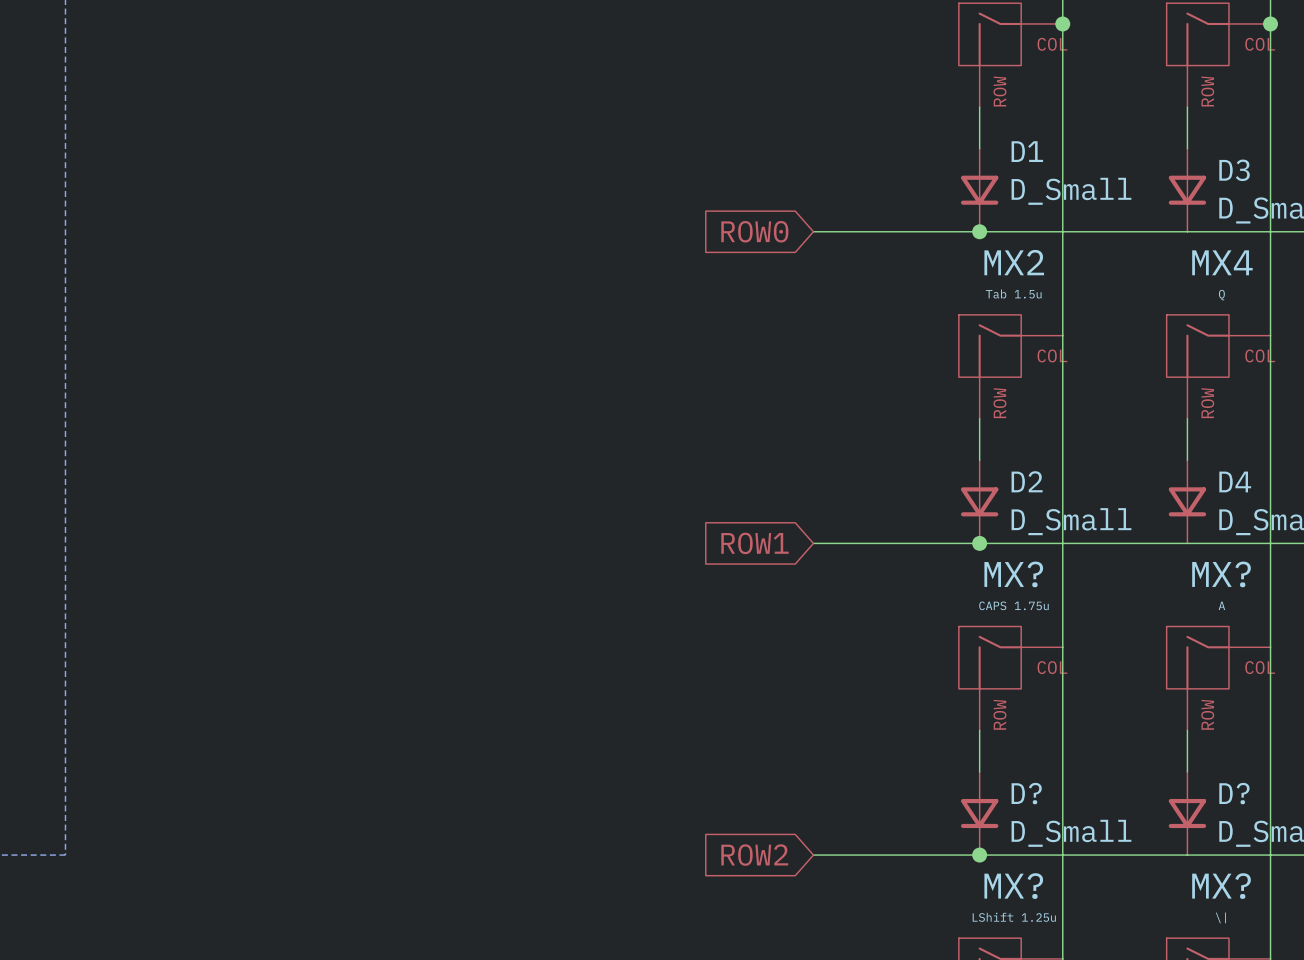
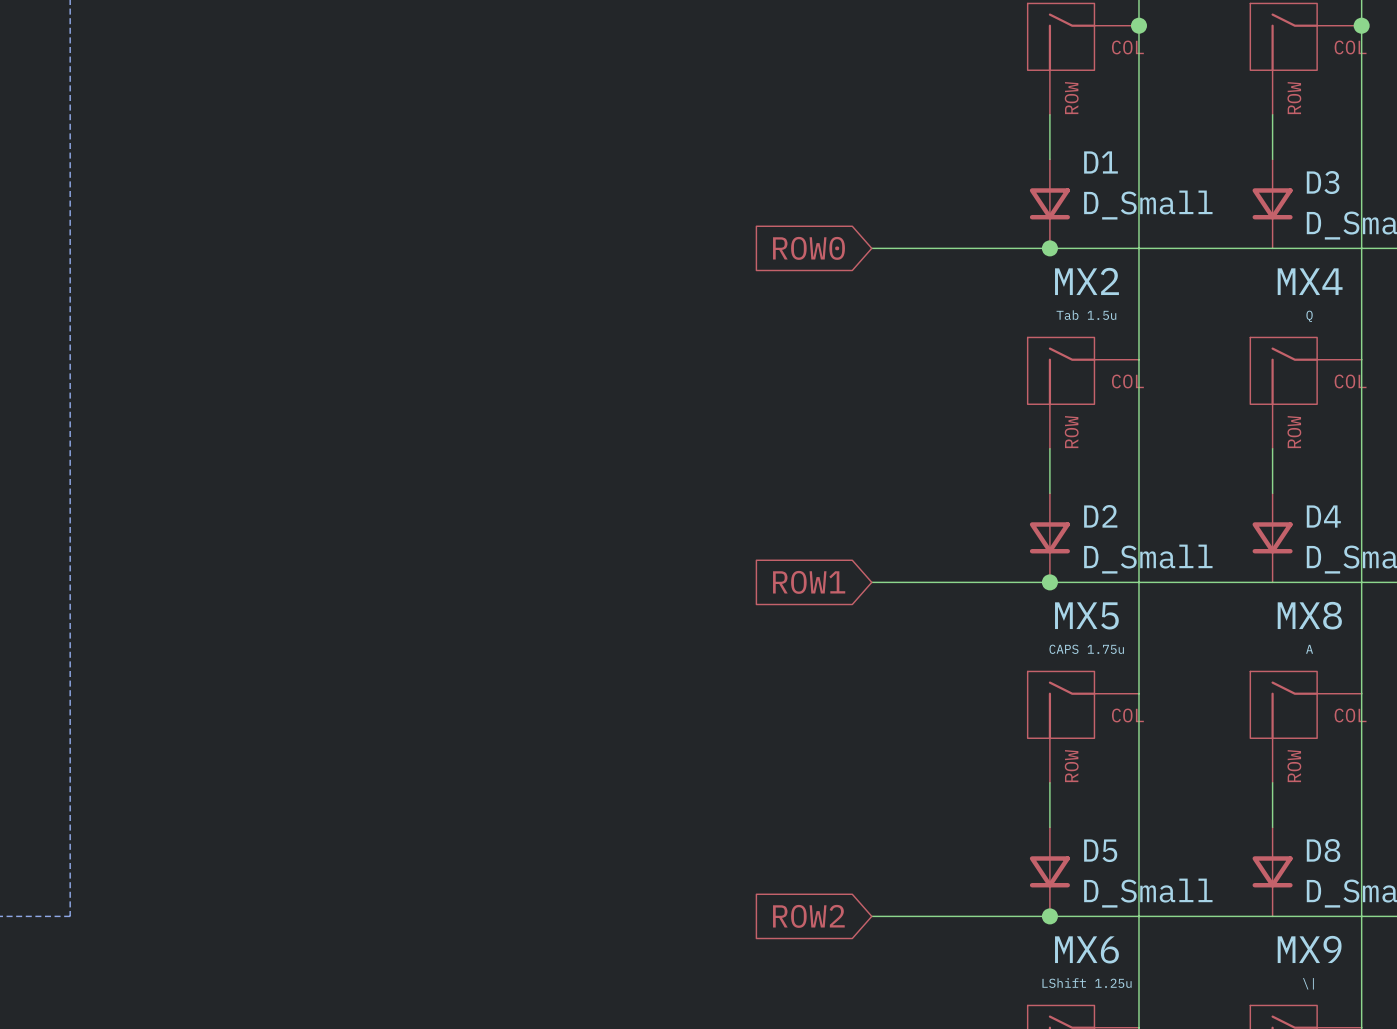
MX? name: MX? (1013, 574) -> MX5 (1086, 615)
MX? name: MX? (1221, 574) -> MX8 (1309, 615)
D? name: D? (1026, 793) -> D5 (1100, 850)
D? name: D? (1234, 793) -> D8 (1323, 850)
MX? name: MX? (1013, 886) -> MX6 (1086, 949)
MX? name: MX? (1221, 886) -> MX9 (1309, 949)

